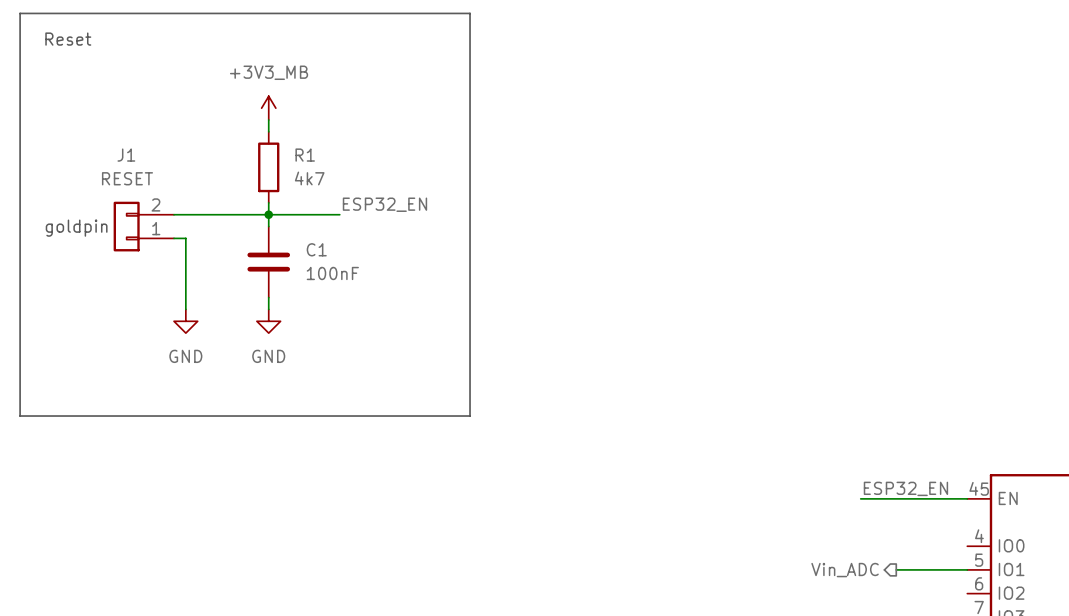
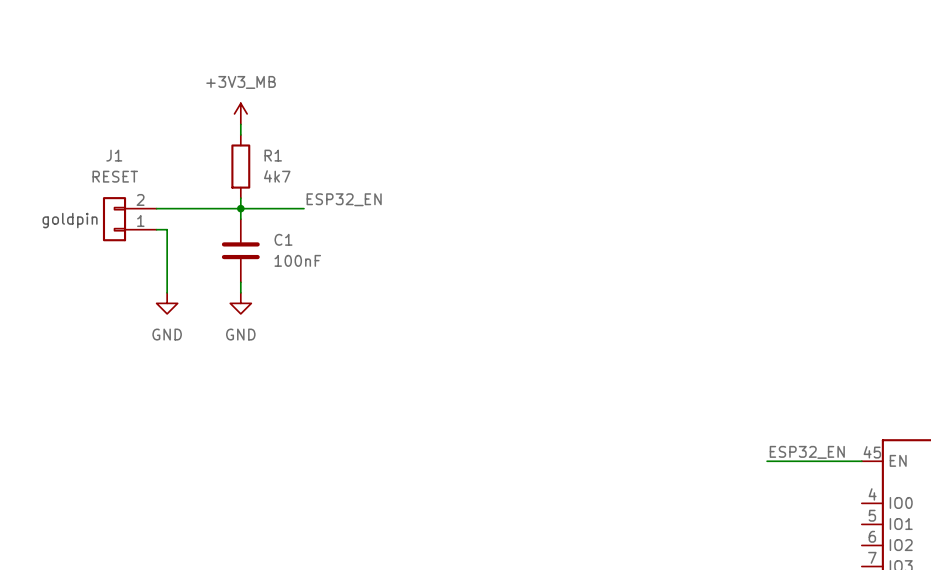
line: (20, 13) (470, 13) (470, 416) (20, 416) (20, 13) -> none
text: Reset (68, 39) -> none
wire: (896, 569) (967, 569) -> none
hierarchical label: Vin_ADC (845, 570) -> none

